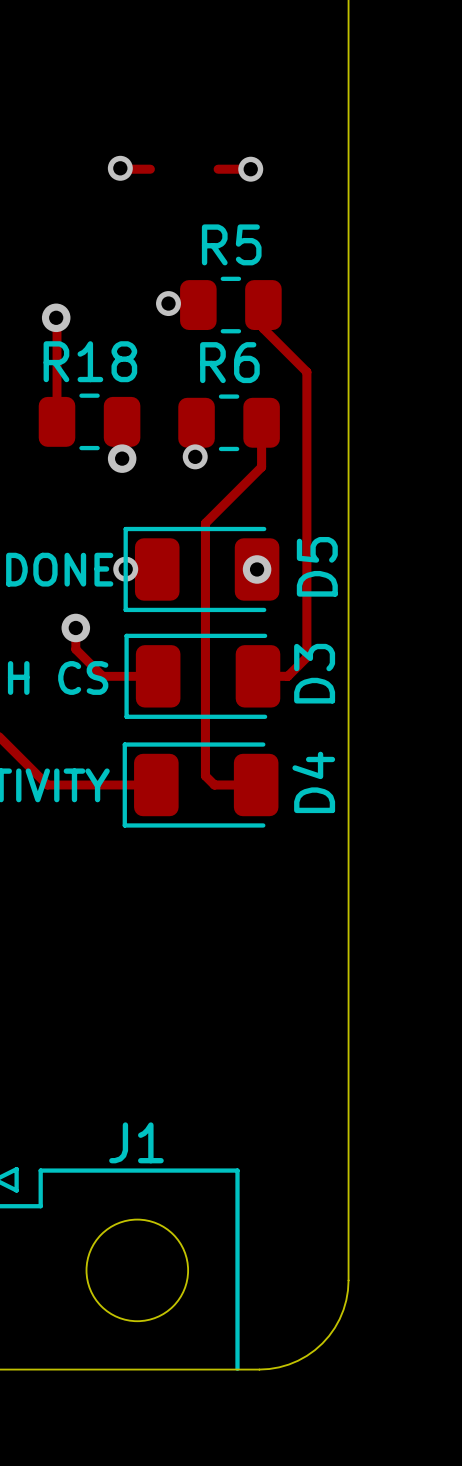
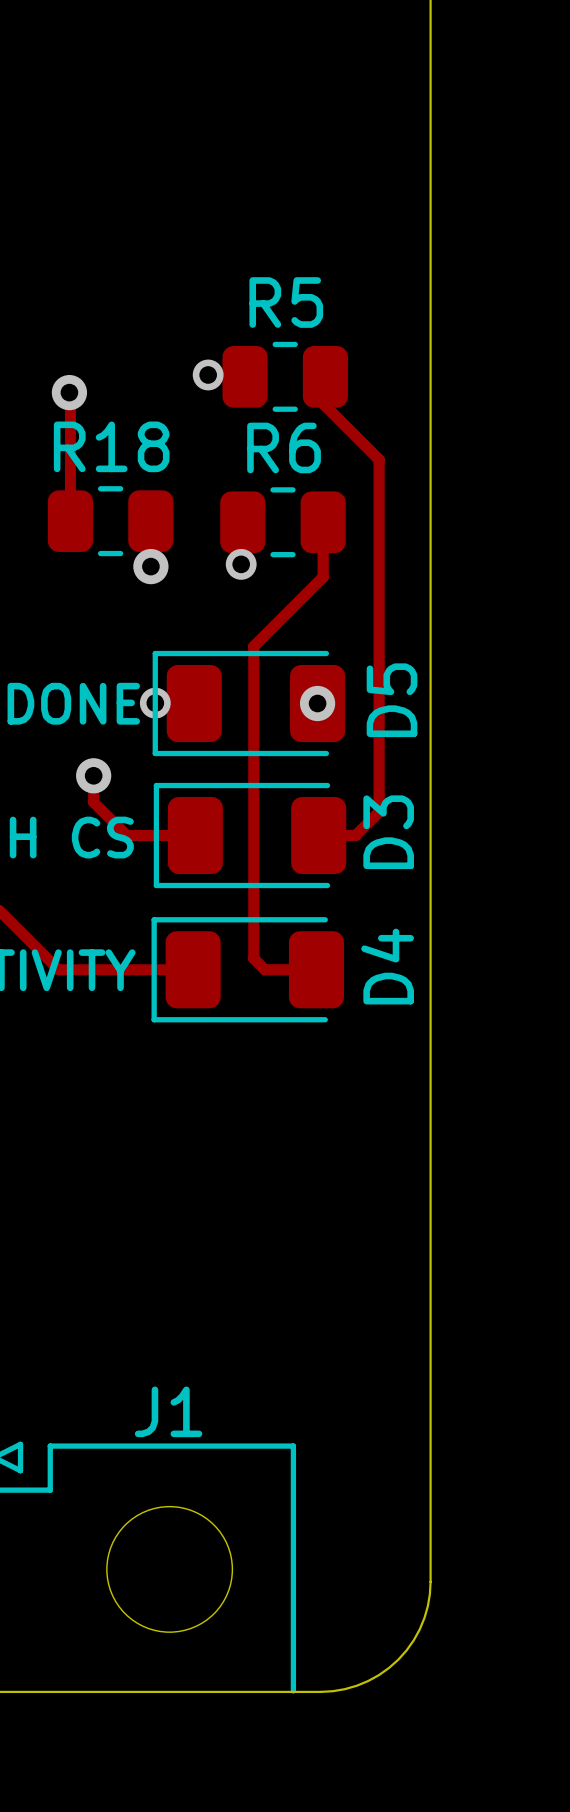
track: (120, 168) (150, 169) -> none
via: (120, 168) -> none
track: (218, 169) (250, 169) -> none
via: (250, 169) -> none

